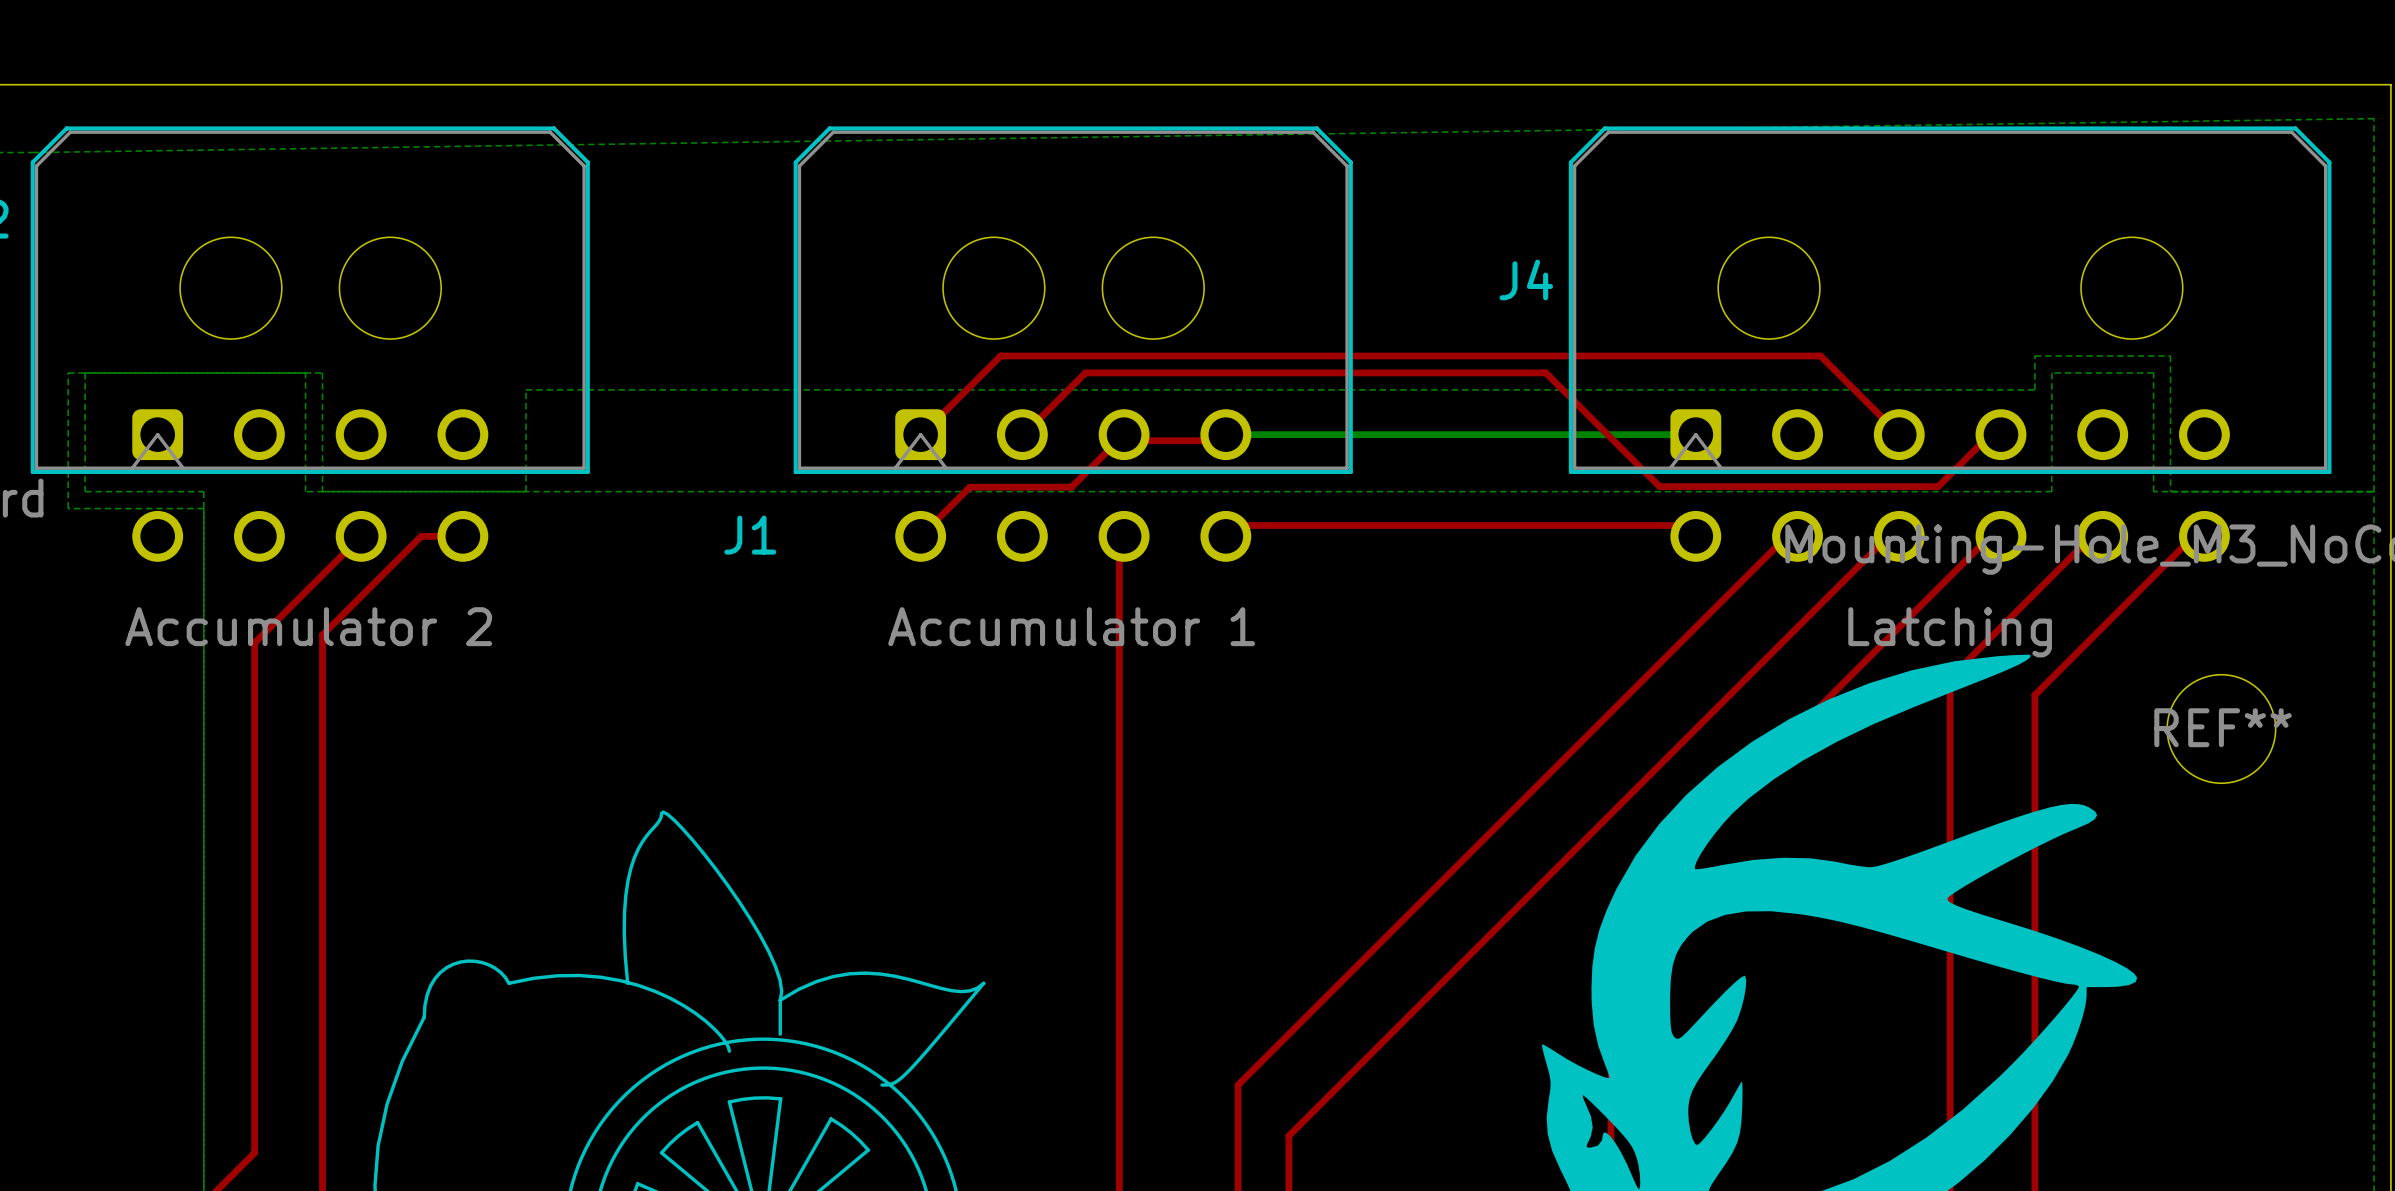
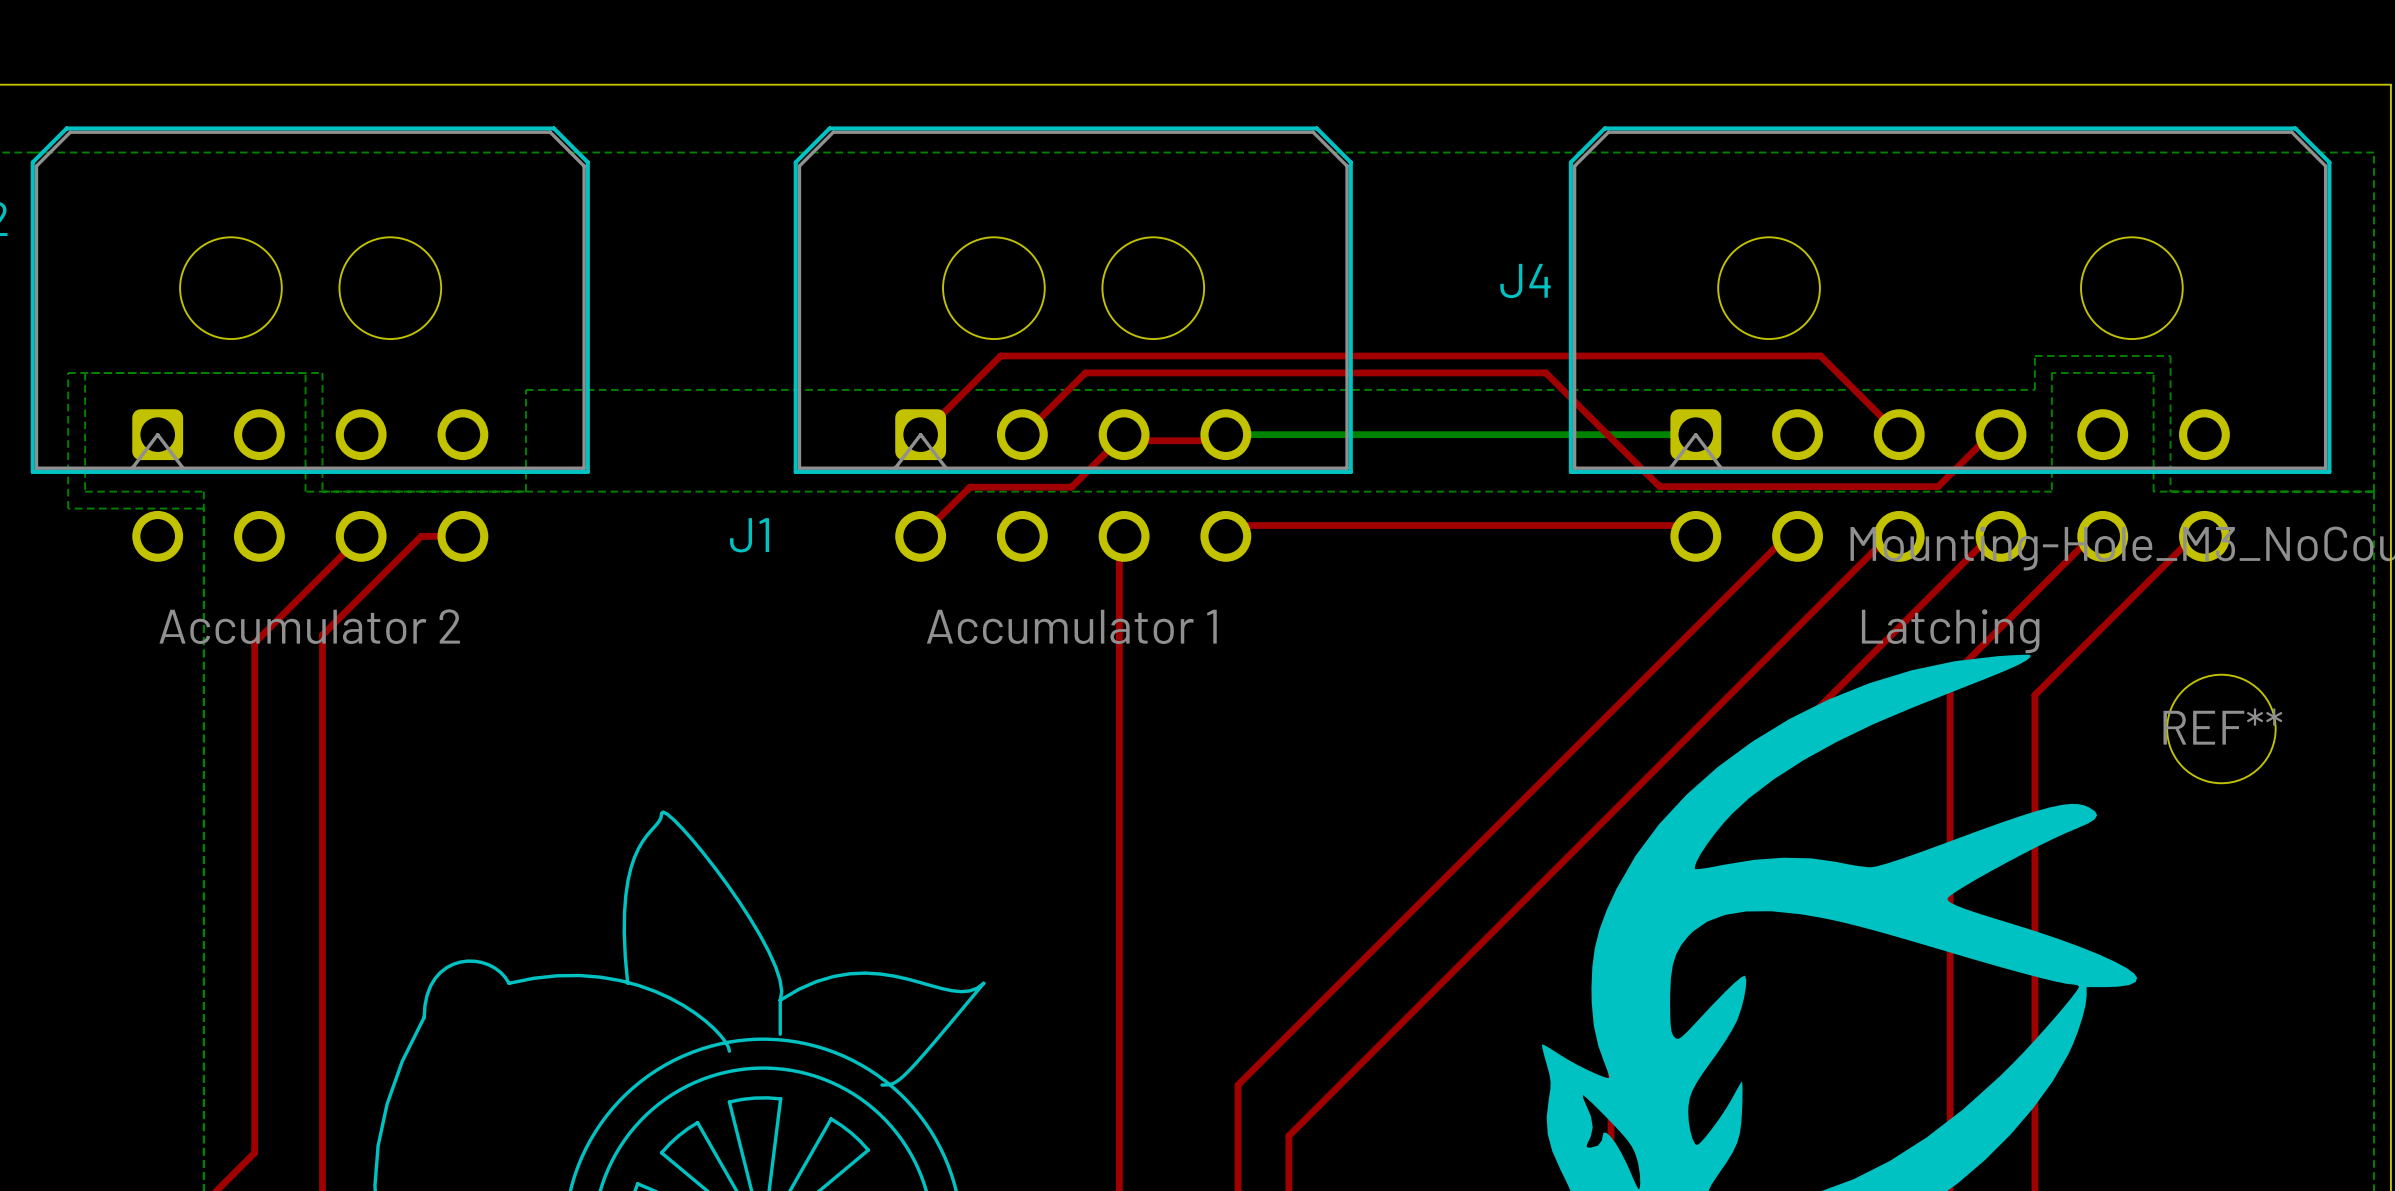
bottom zone outline: (34, 152) (2373, 118) (2373, 152) -> (34, 152) (2373, 152)

